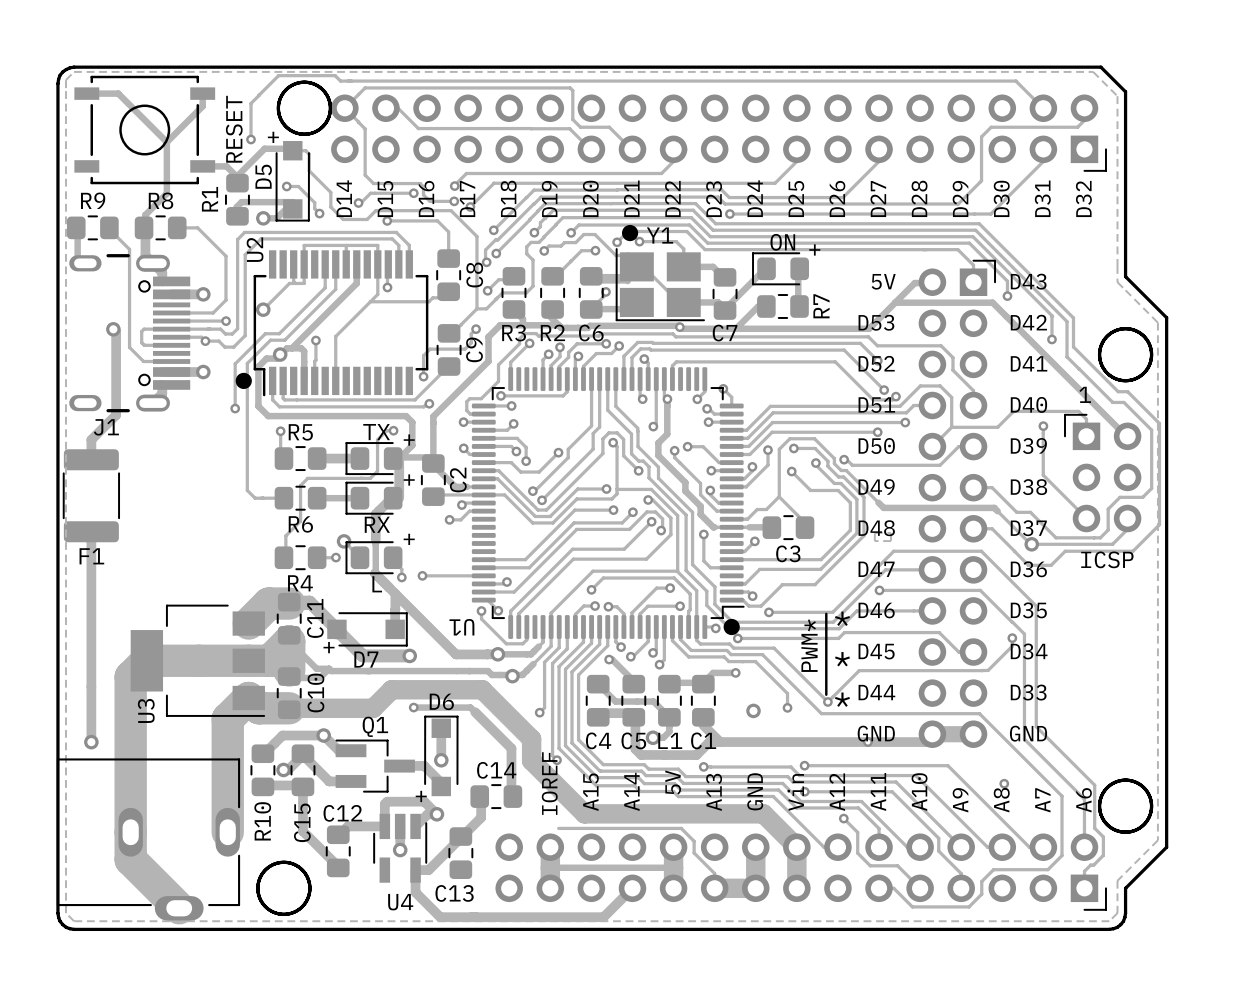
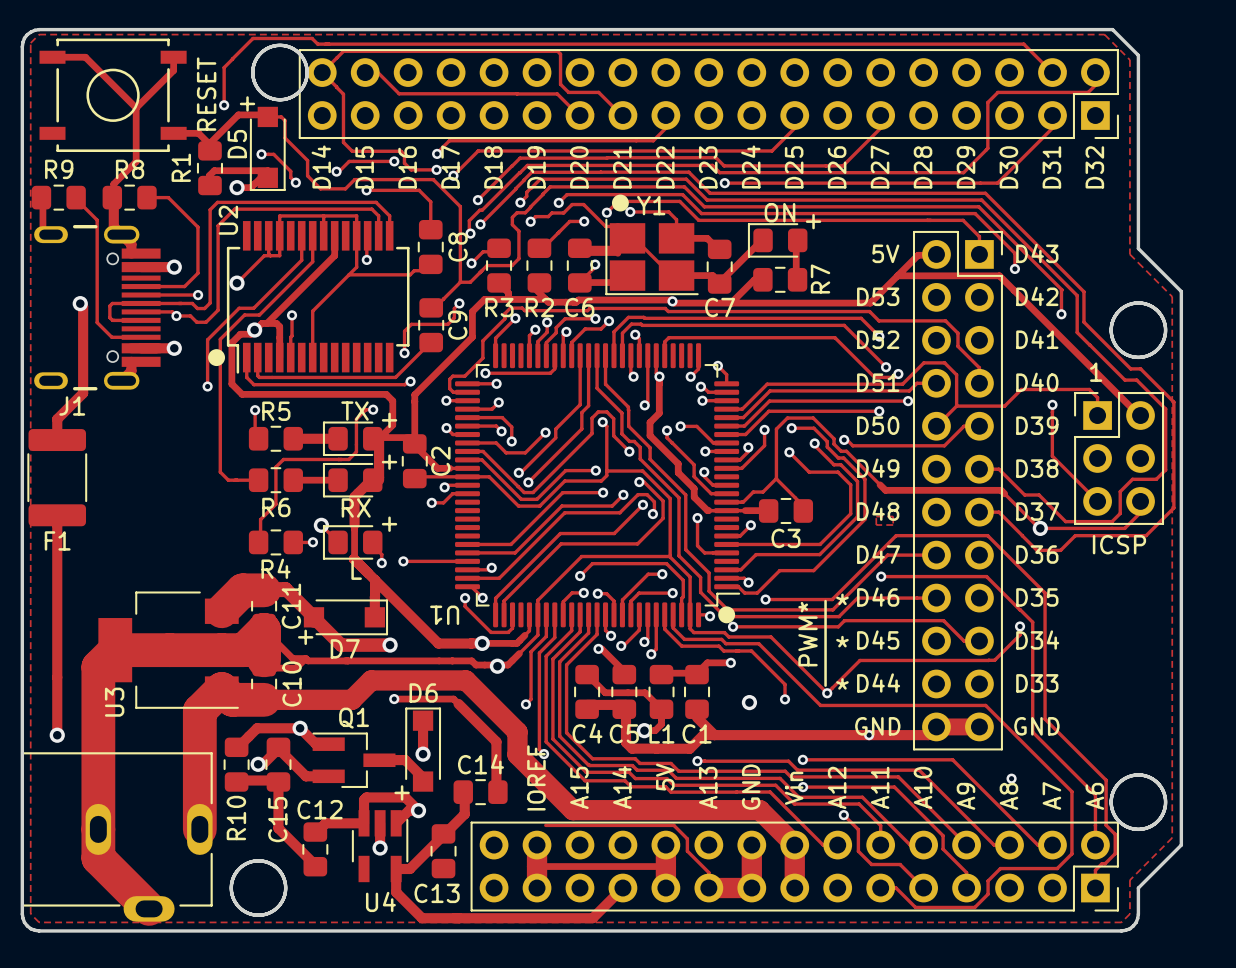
part footprint: [331, 94, 1107, 172] -> [298, 49, 1119, 140]
part footprint: [918, 259, 997, 748] -> [912, 230, 1003, 751]
part footprint: [1064, 413, 1142, 533] -> [1074, 392, 1165, 525]
part footprint: [495, 833, 1107, 911] -> [470, 821, 1119, 912]

